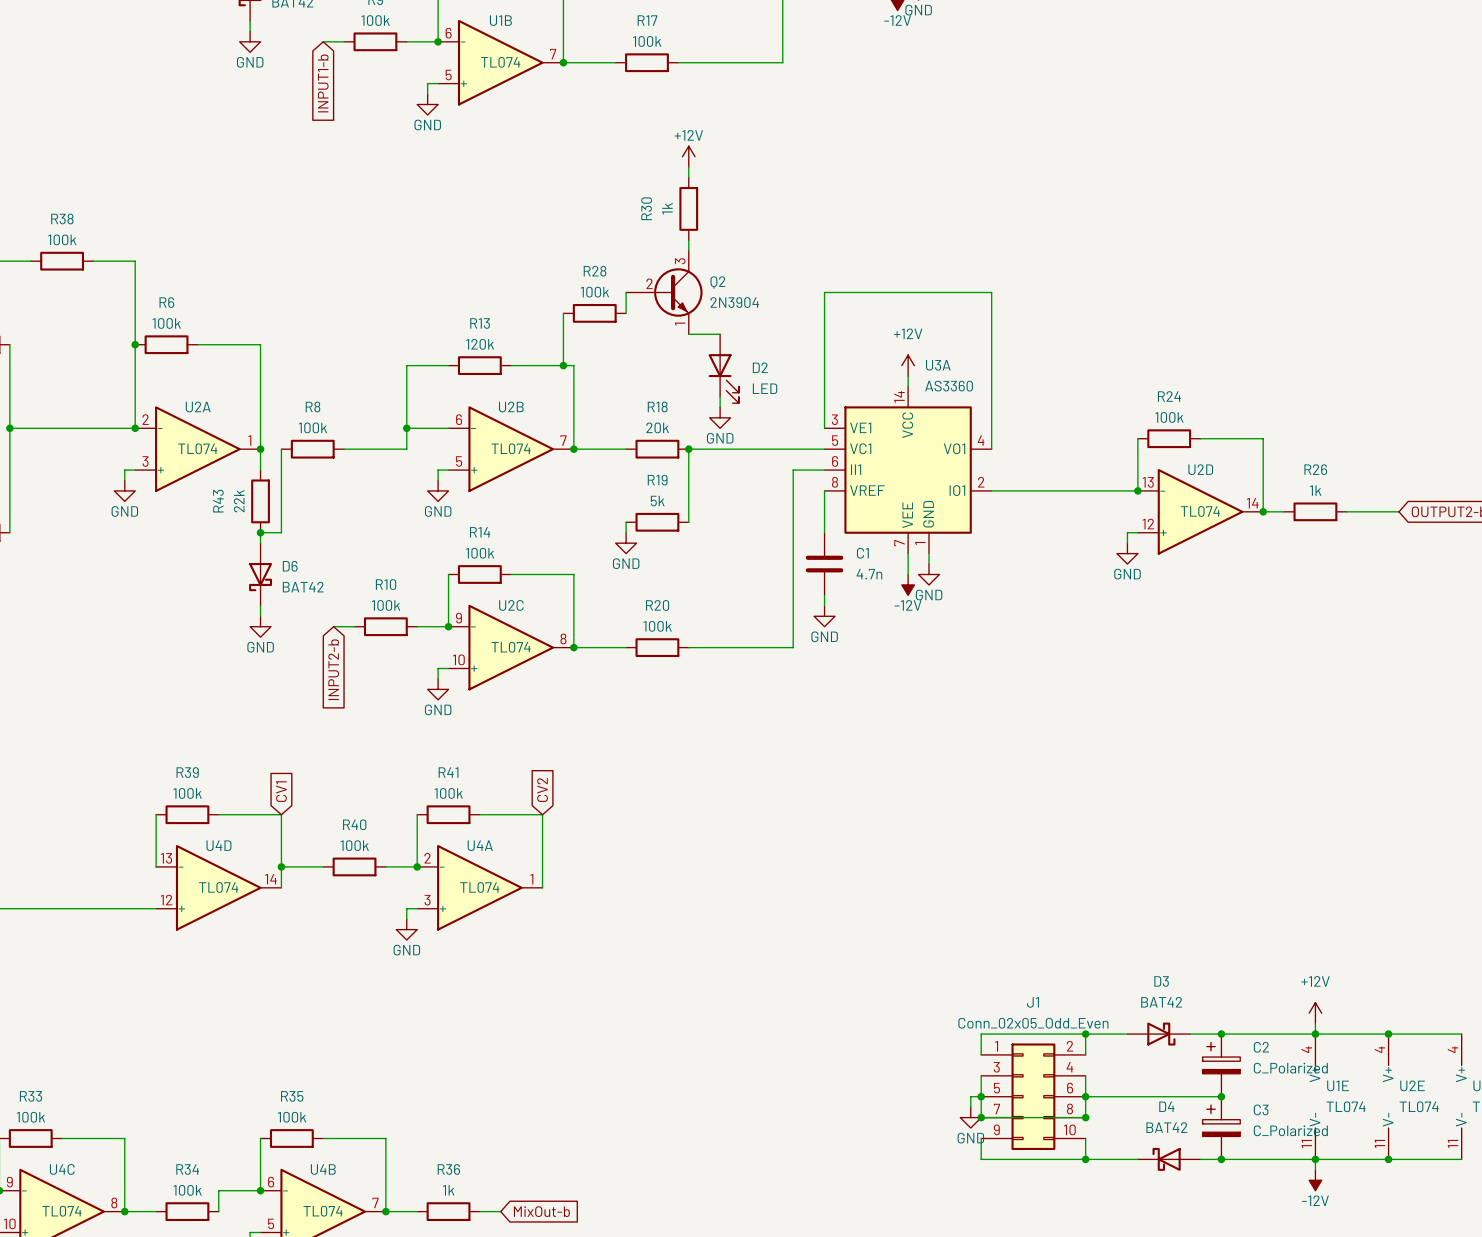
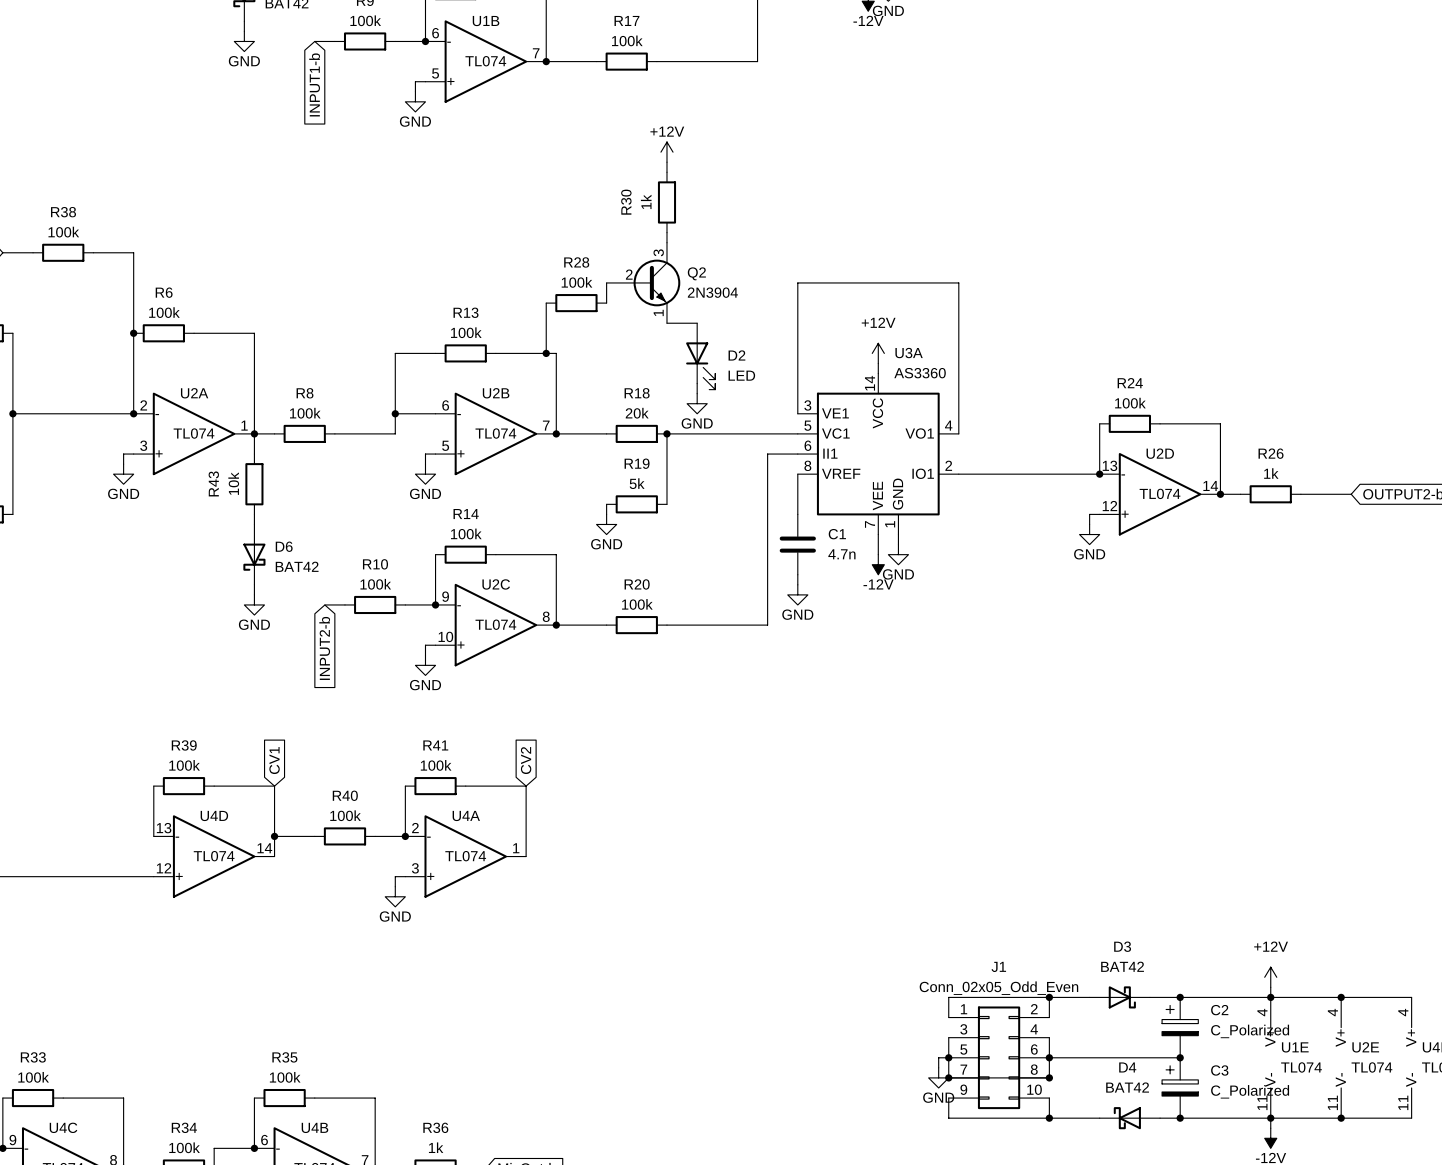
R13 value: 120k (480, 344) -> 100k (466, 332)
wire: (281, 449) (281, 532) (260, 532) -> (274, 433) (254, 433)
R43 value: 22k (239, 501) -> 10k (233, 483)
junction: (260, 532) -> none

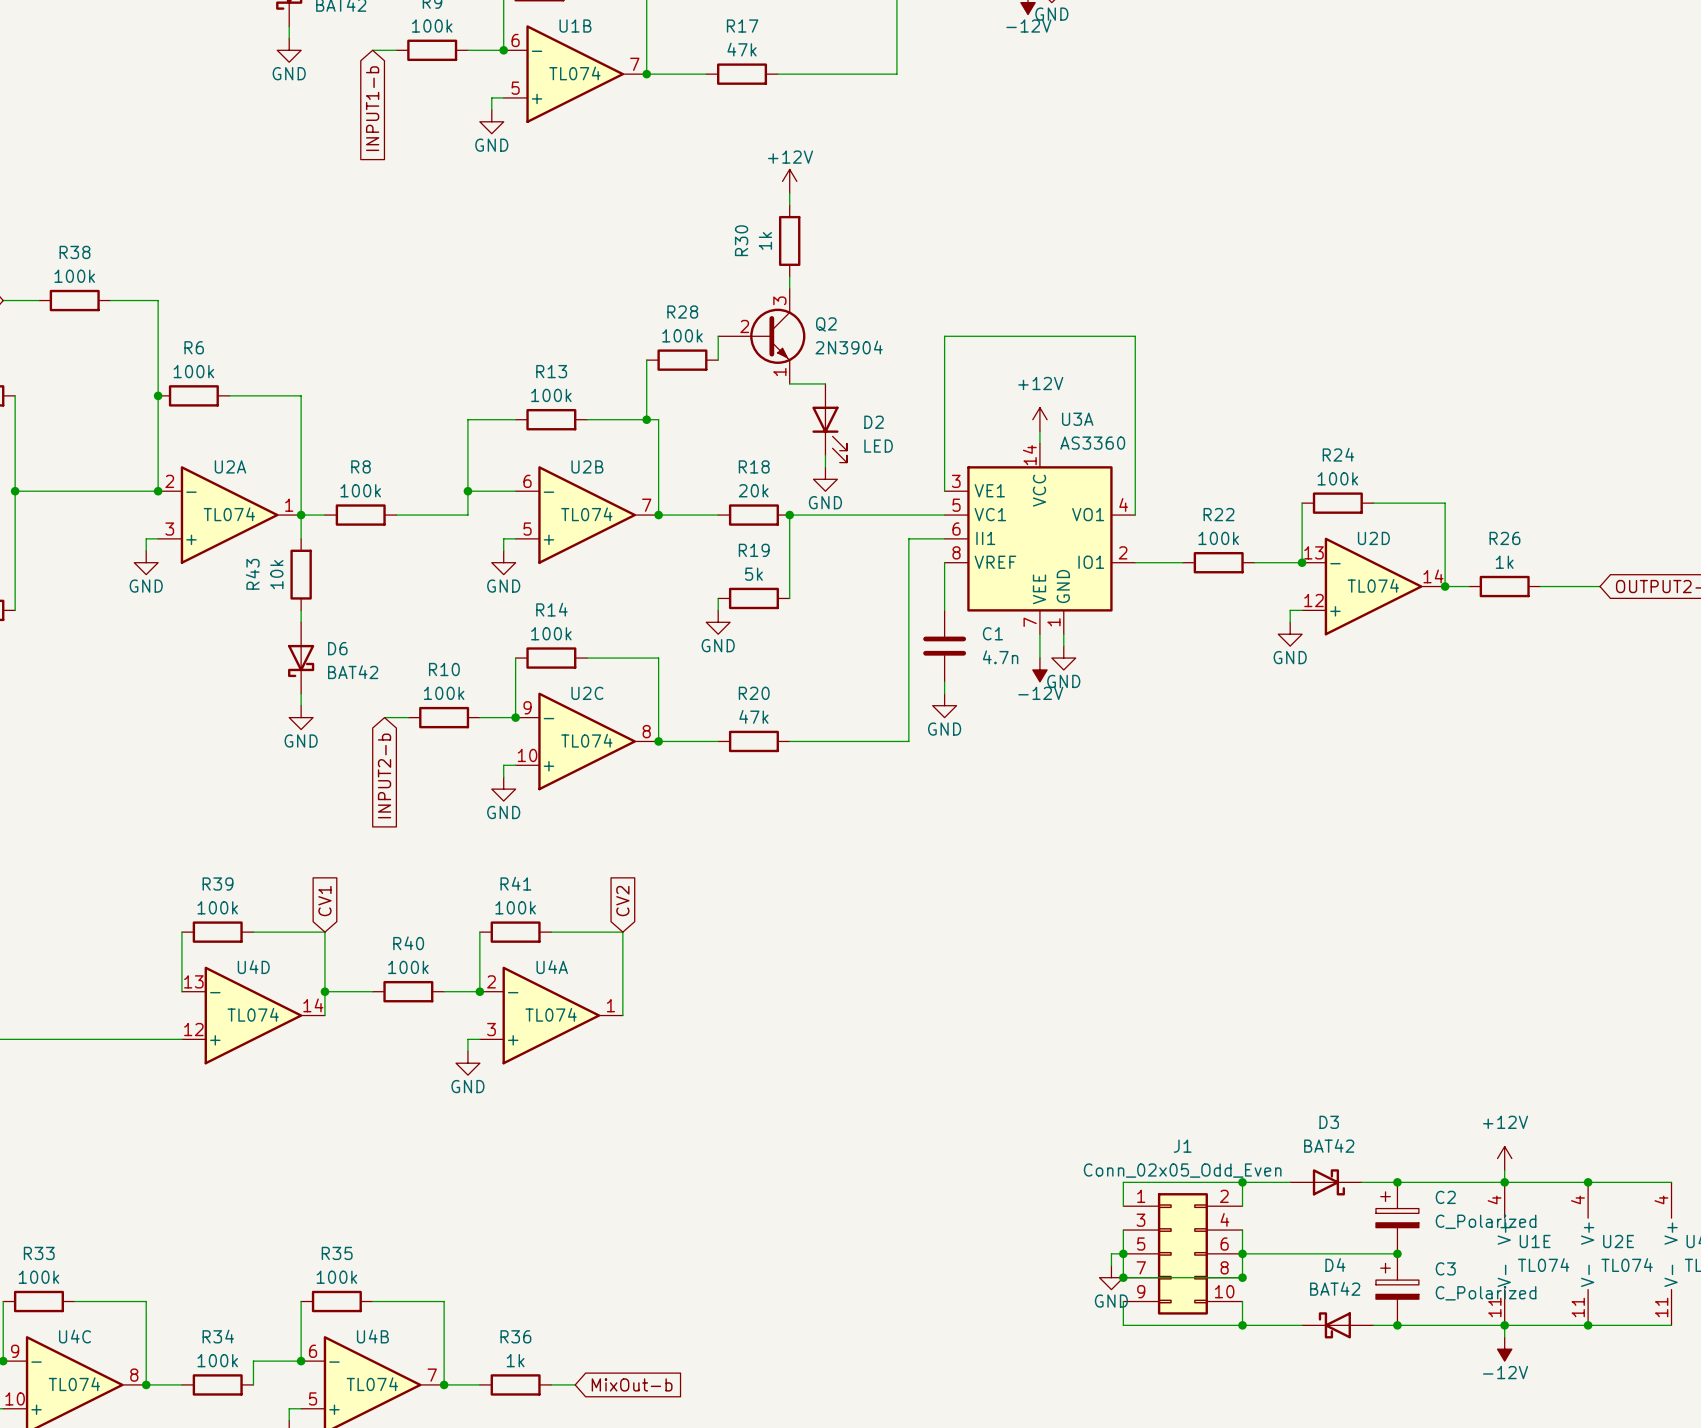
R17 value: 100k (627, 40) -> 47k (742, 49)
wire: (999, 474) (1059, 474) -> none
R22: none -> 100k (1218, 562)
R20 value: 100k (637, 604) -> 47k (753, 716)

